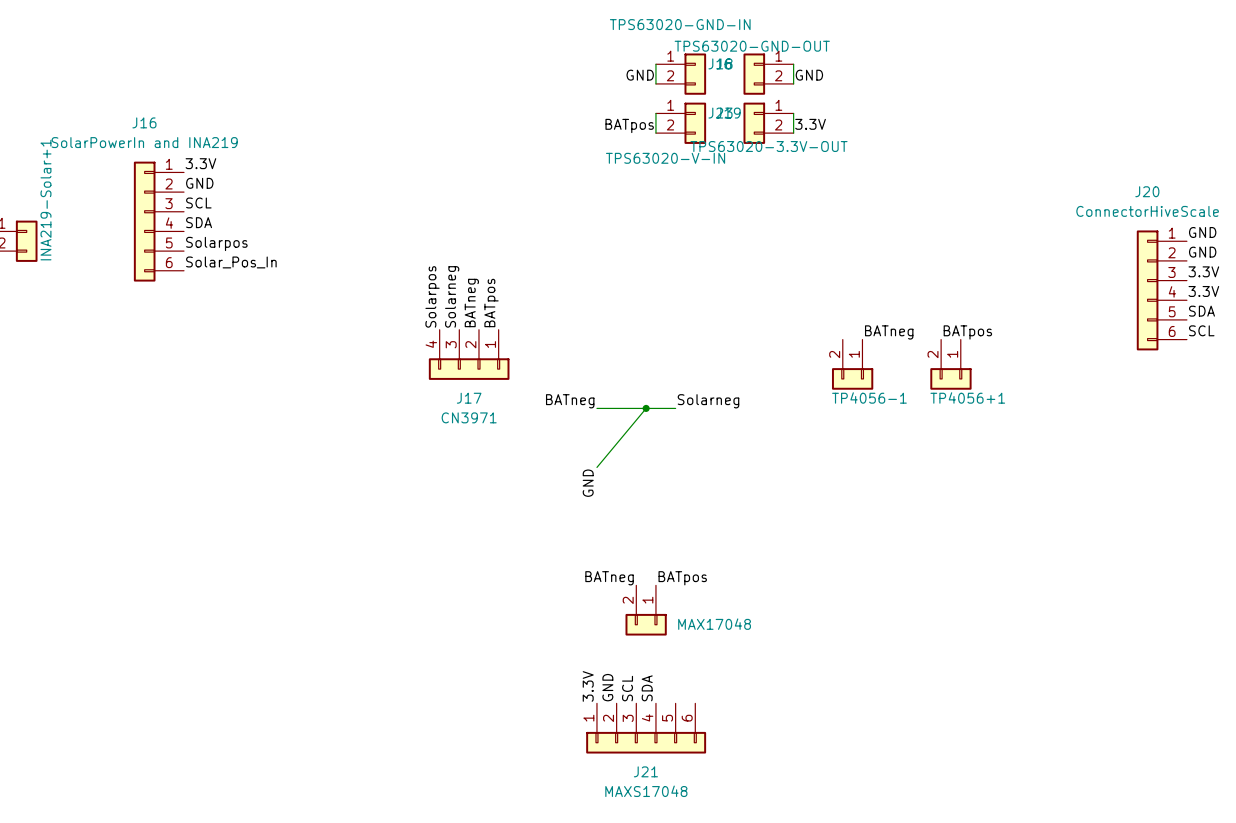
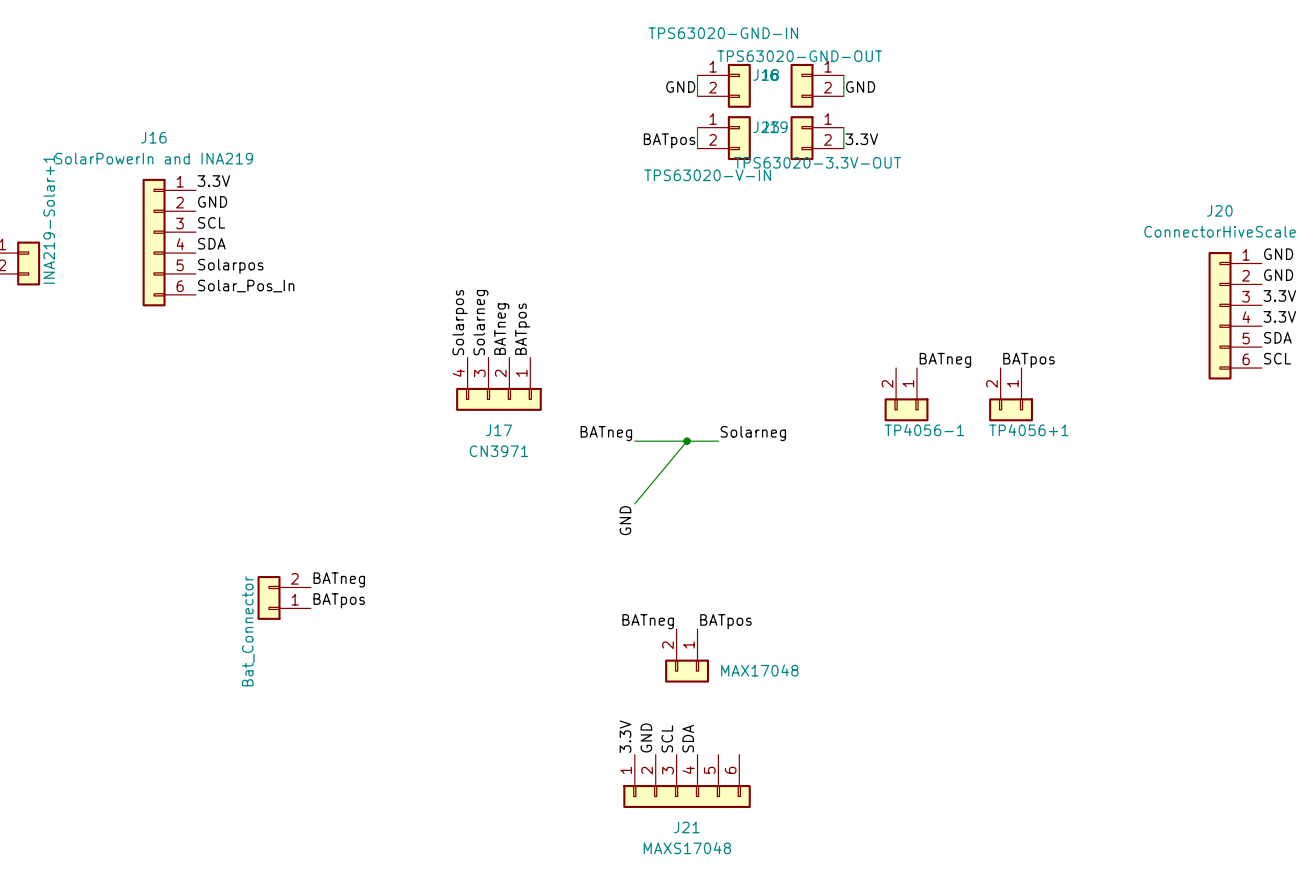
label: none -> BATneg (339, 579)
Bat_Connector: none -> (284, 597)
label: none -> BATpos (339, 600)

